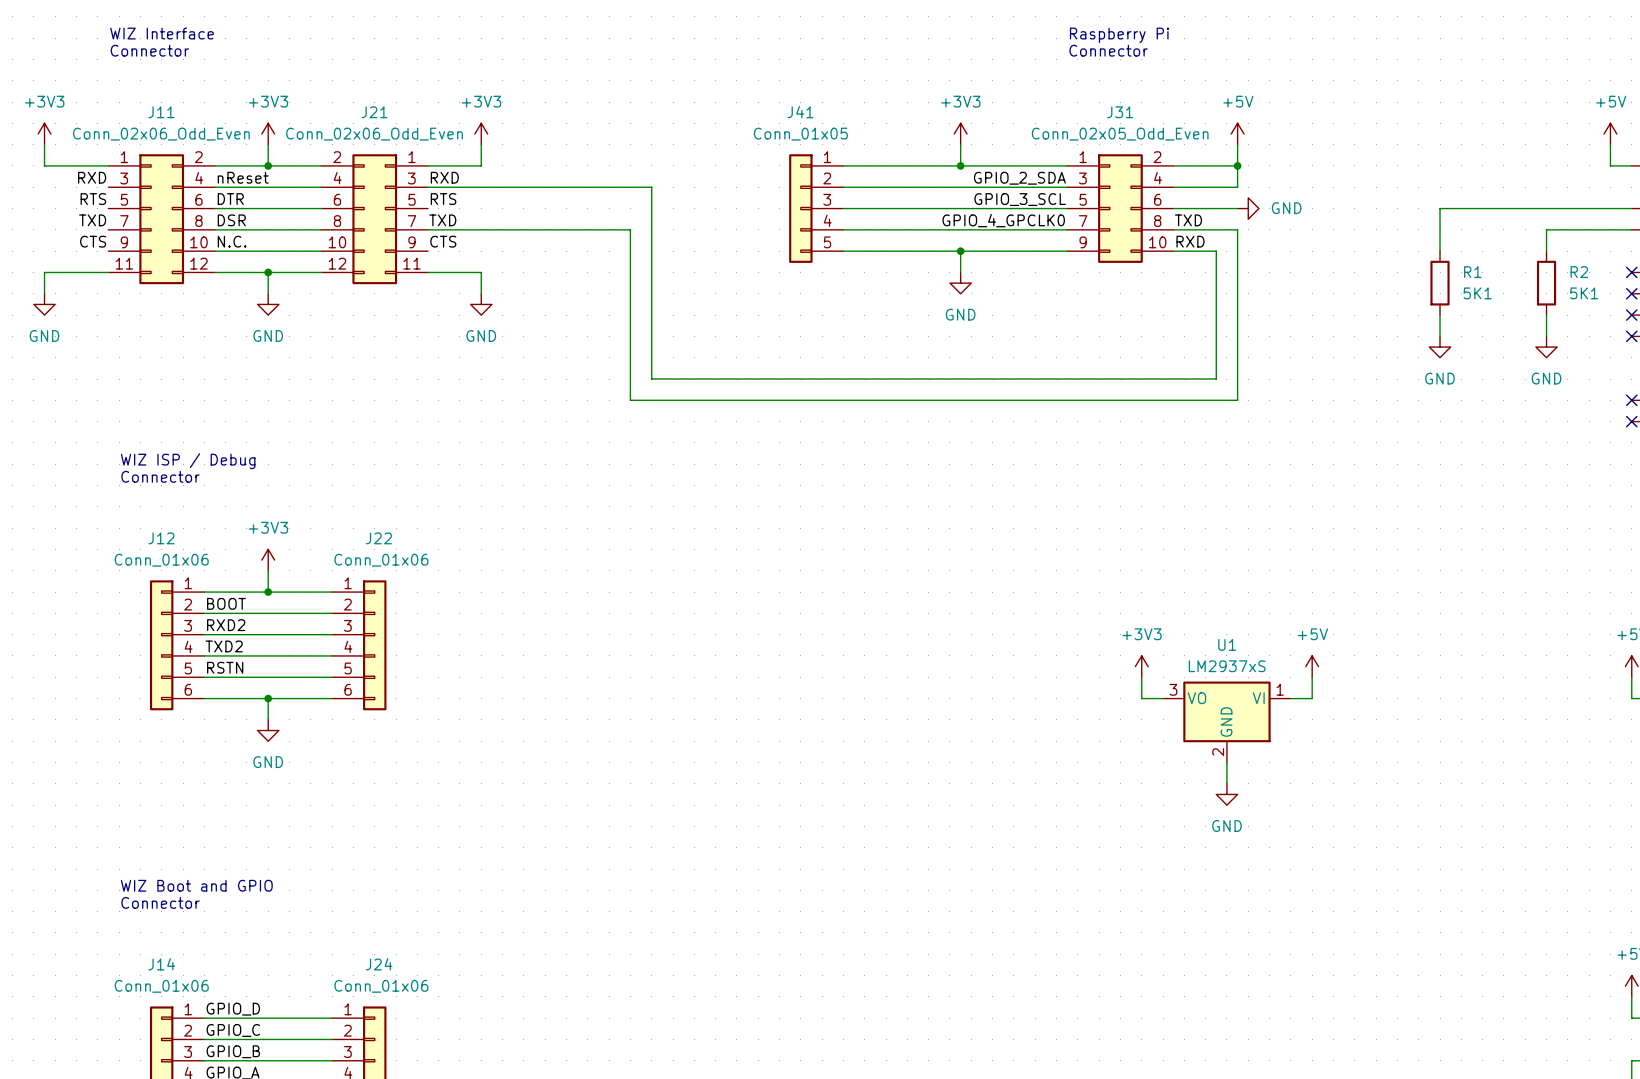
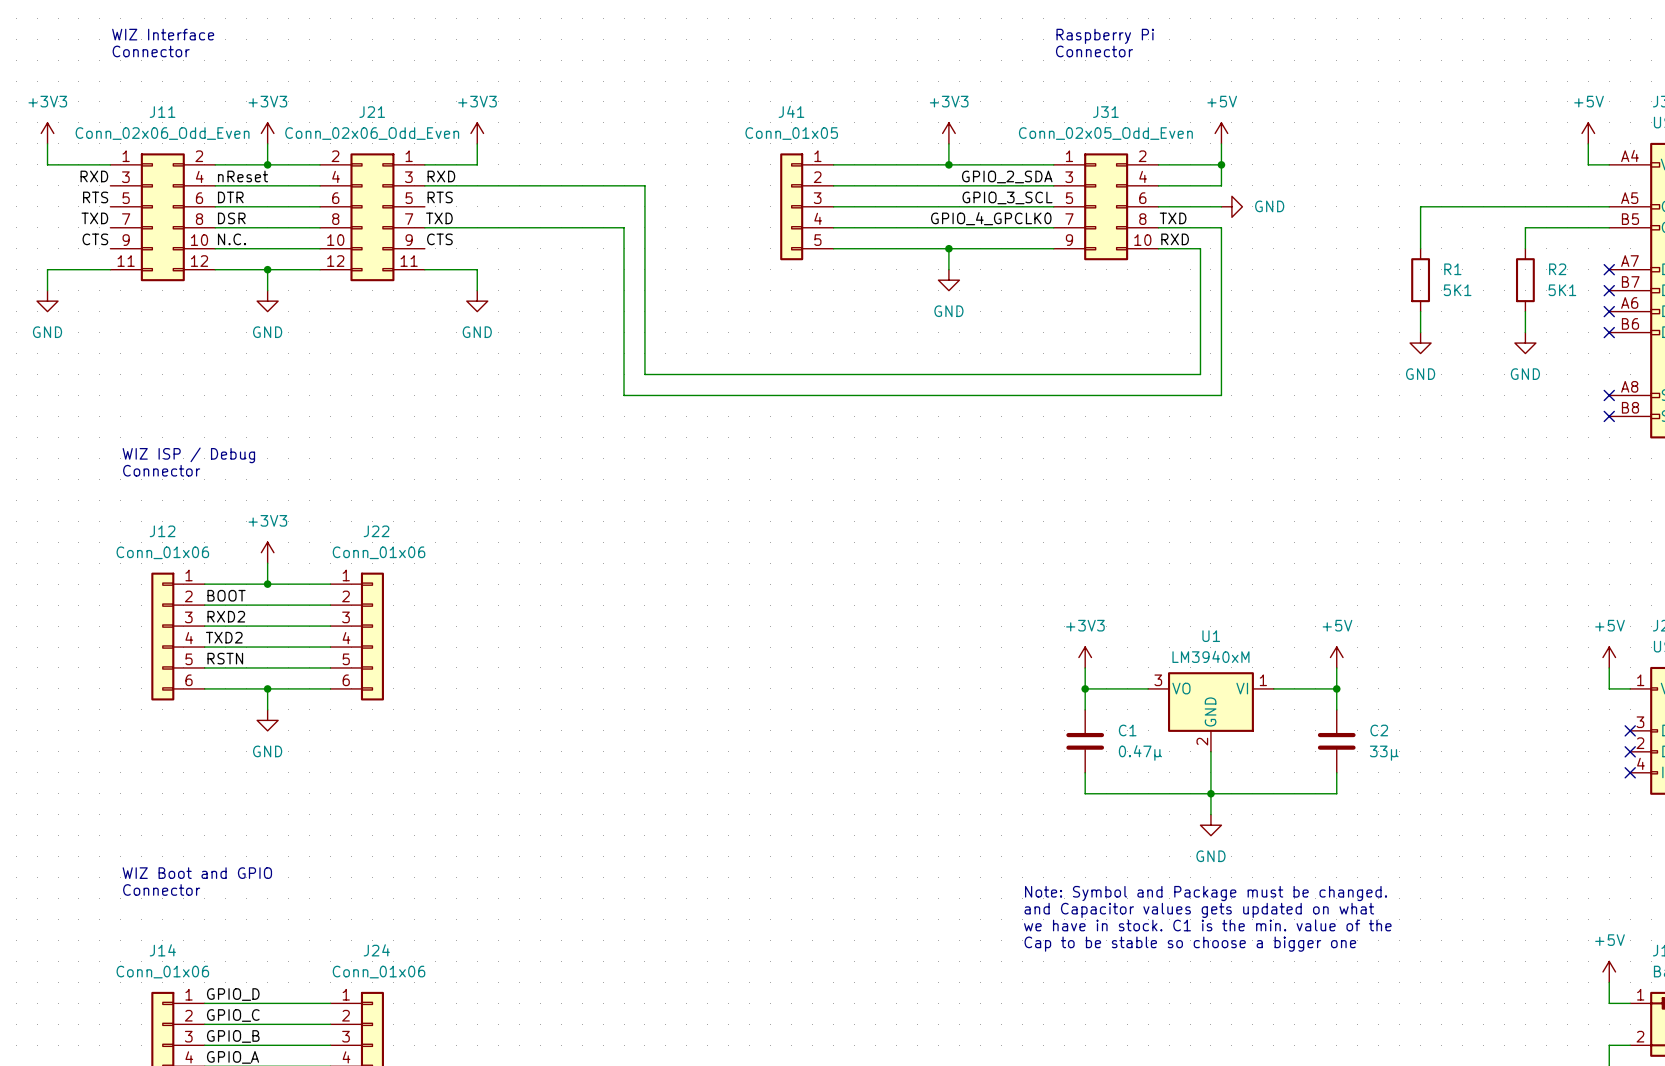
power symbol position: +3V3 (1141, 666) -> +3V3 (1085, 657)
U1 value: LM2937xS (1227, 666) -> LM3940xM (1210, 656)
power symbol position: +5V (1312, 666) -> +5V (1336, 657)
wire: none -> (1085, 667) (1085, 709)
wire: (1141, 677) (1141, 698) -> (1085, 688) (1127, 688)
wire: (1312, 677) (1312, 698) -> (1336, 688) (1294, 688)
wire: none -> (1336, 667) (1336, 709)
junction: none -> (1085, 688)
junction: none -> (1336, 688)
C1: none -> 0.47µ (1085, 741)
C2: none -> 33µ (1336, 741)
wire: none -> (1085, 772) (1085, 793) (1336, 793) (1336, 772)
wire: none -> (1210, 772) (1210, 814)
power symbol position: GND (1226, 794) -> GND (1210, 825)
junction: none -> (1210, 793)
text: none -> Note: Symbol and Package must be changed. (1206, 893)
text: none -> and Capacitor values gets updated on what (1199, 910)
text: none -> we have in stock. C1 is the min. value of the (1207, 925)
text: none -> Cap to be stable so choose a bigger one (1190, 944)

